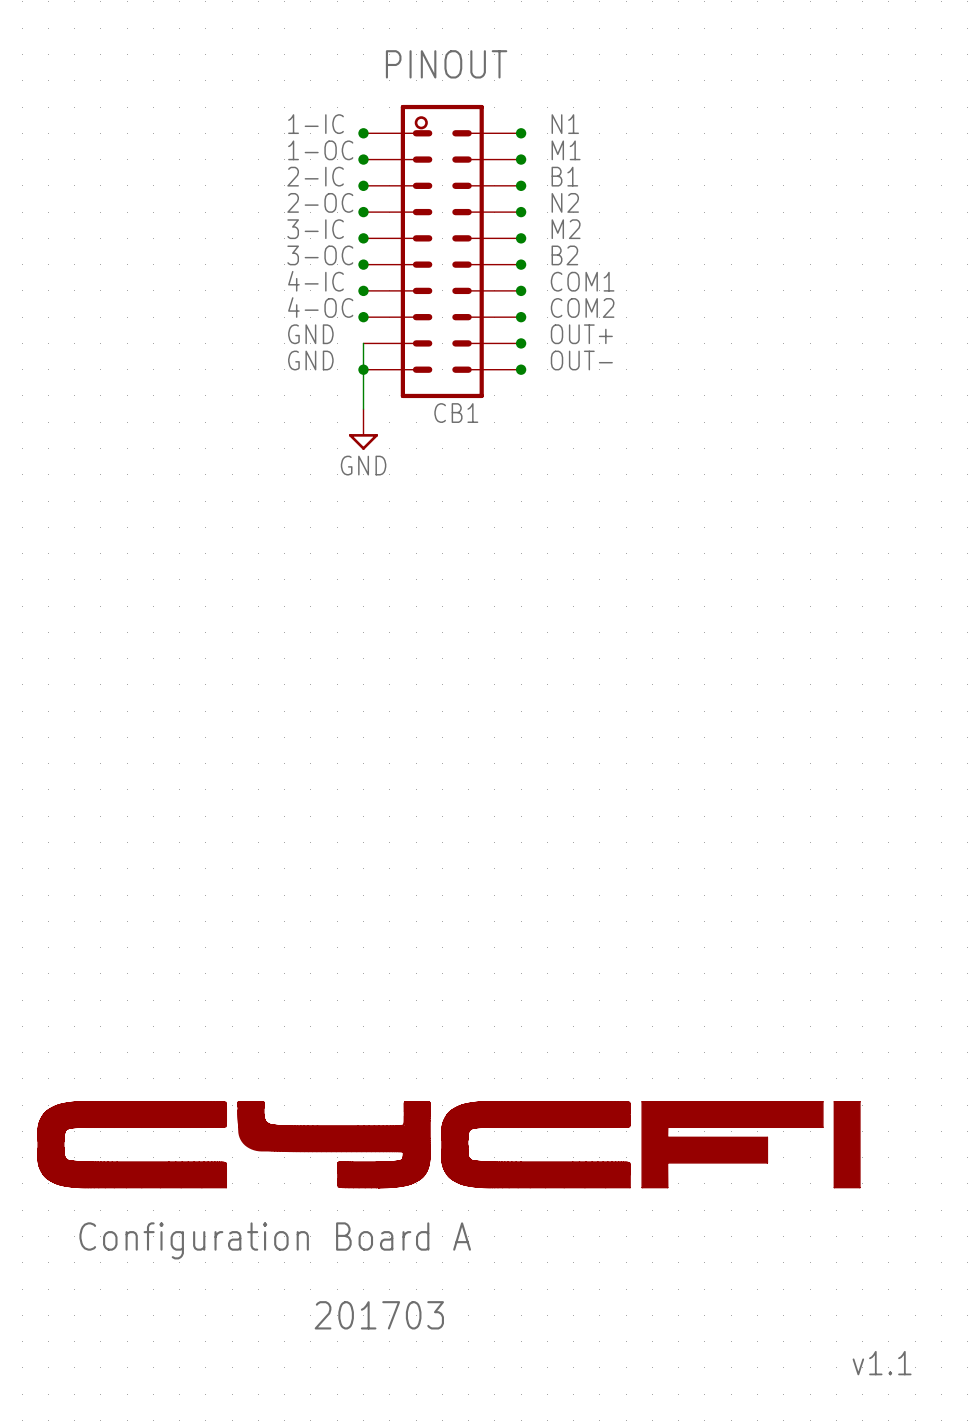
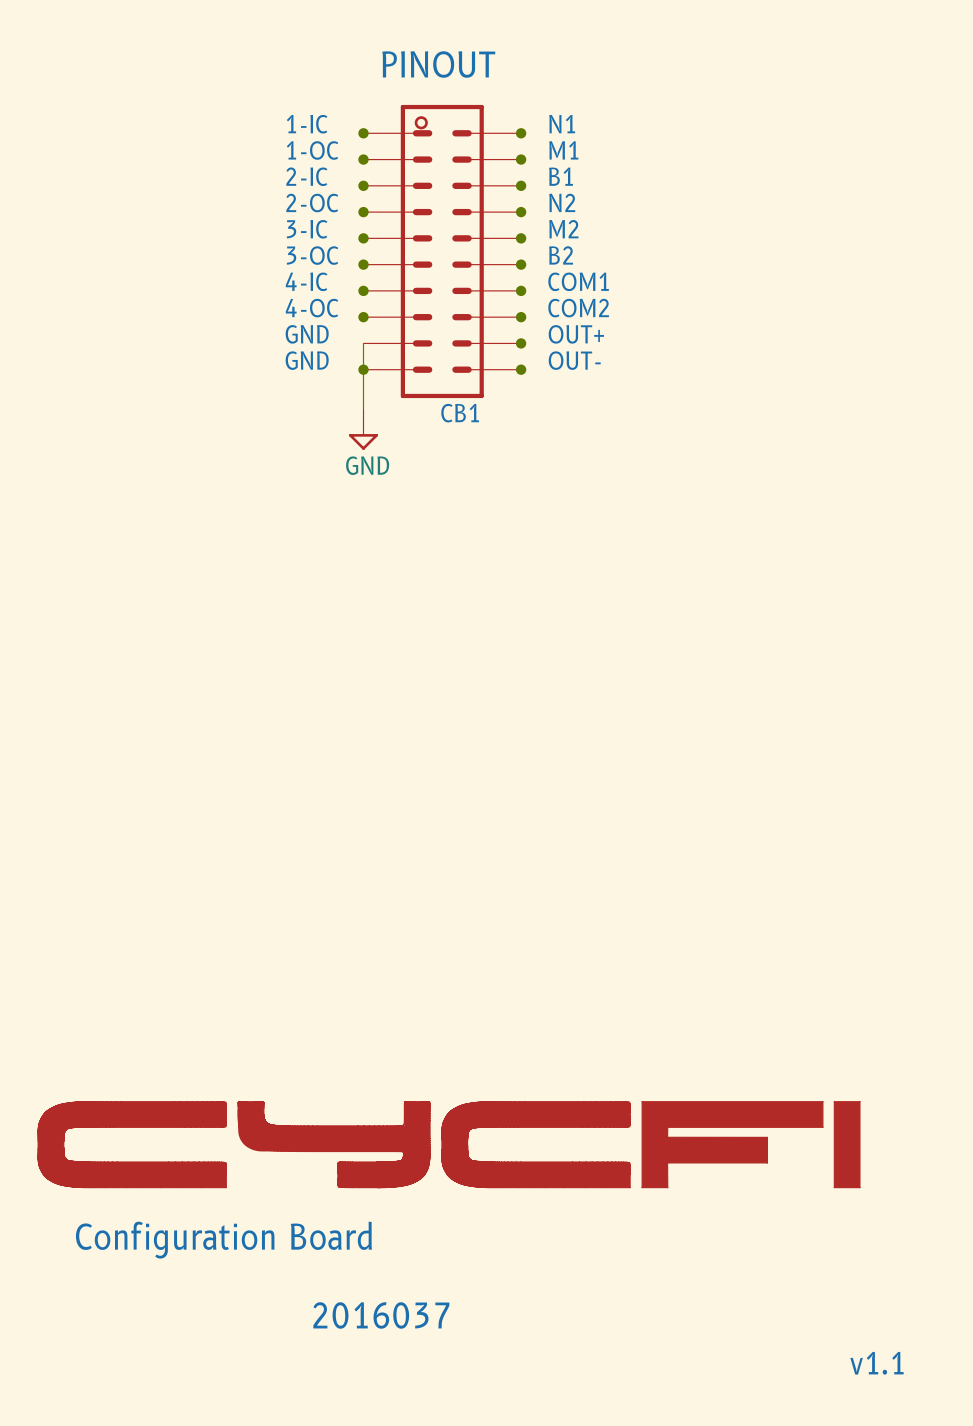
text: Configuration Board A (275, 1240) -> Configuration Board (223, 1240)
text: 201703 (379, 1315) -> 2016037 (381, 1315)

